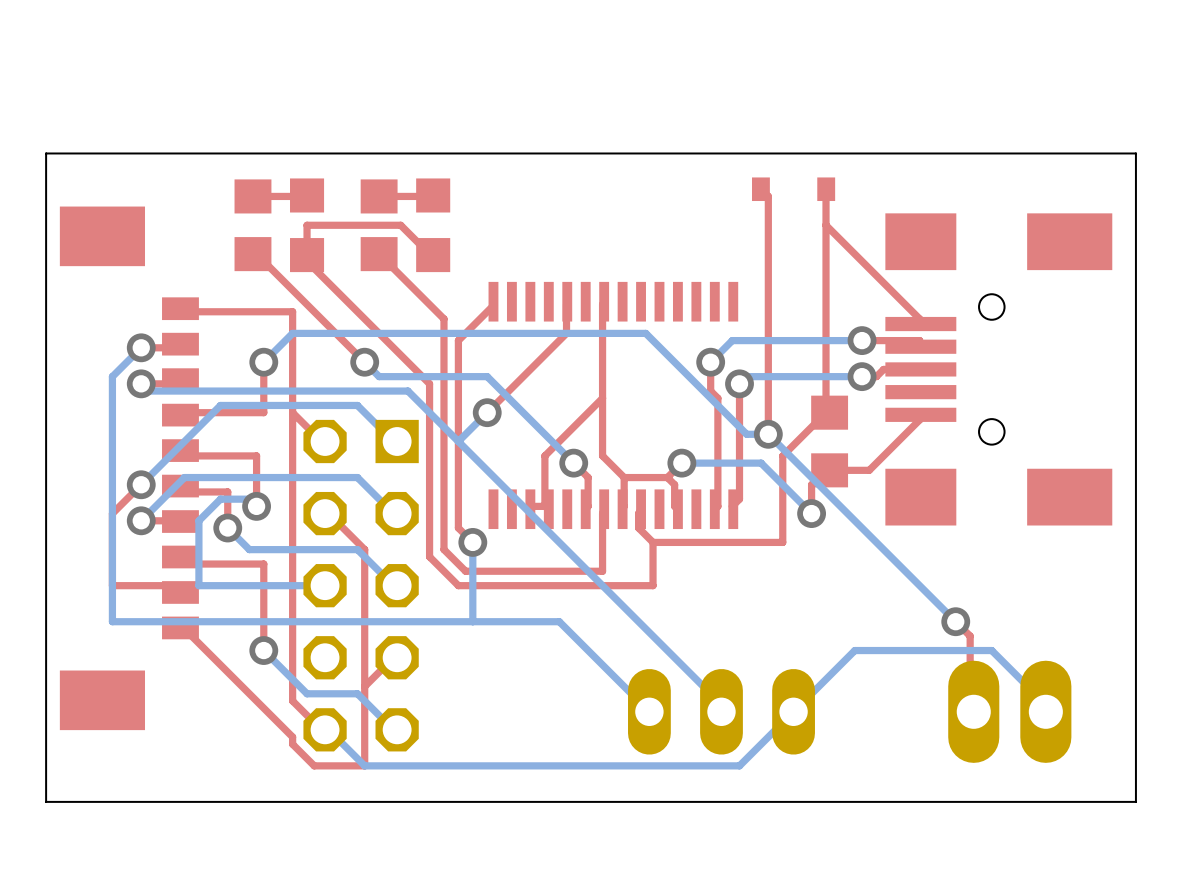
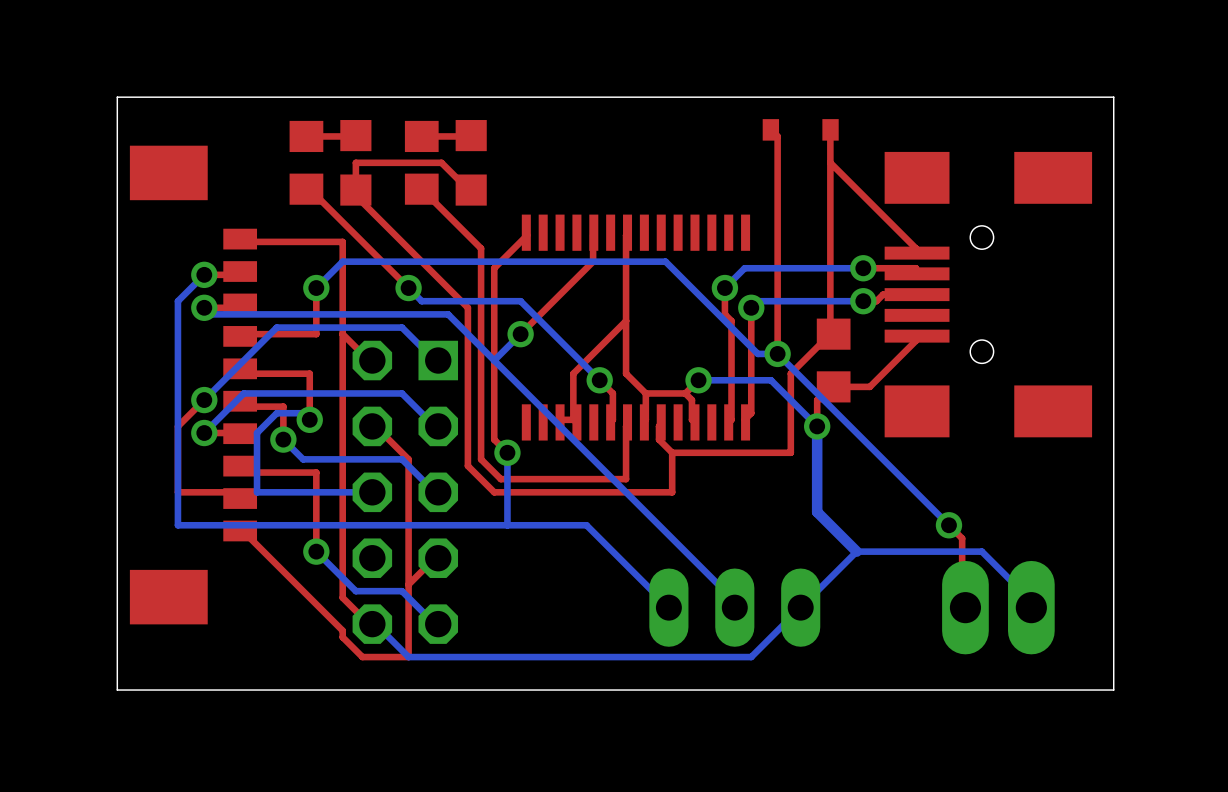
bottom track: none -> (817, 426) (817, 512) (856, 551)

